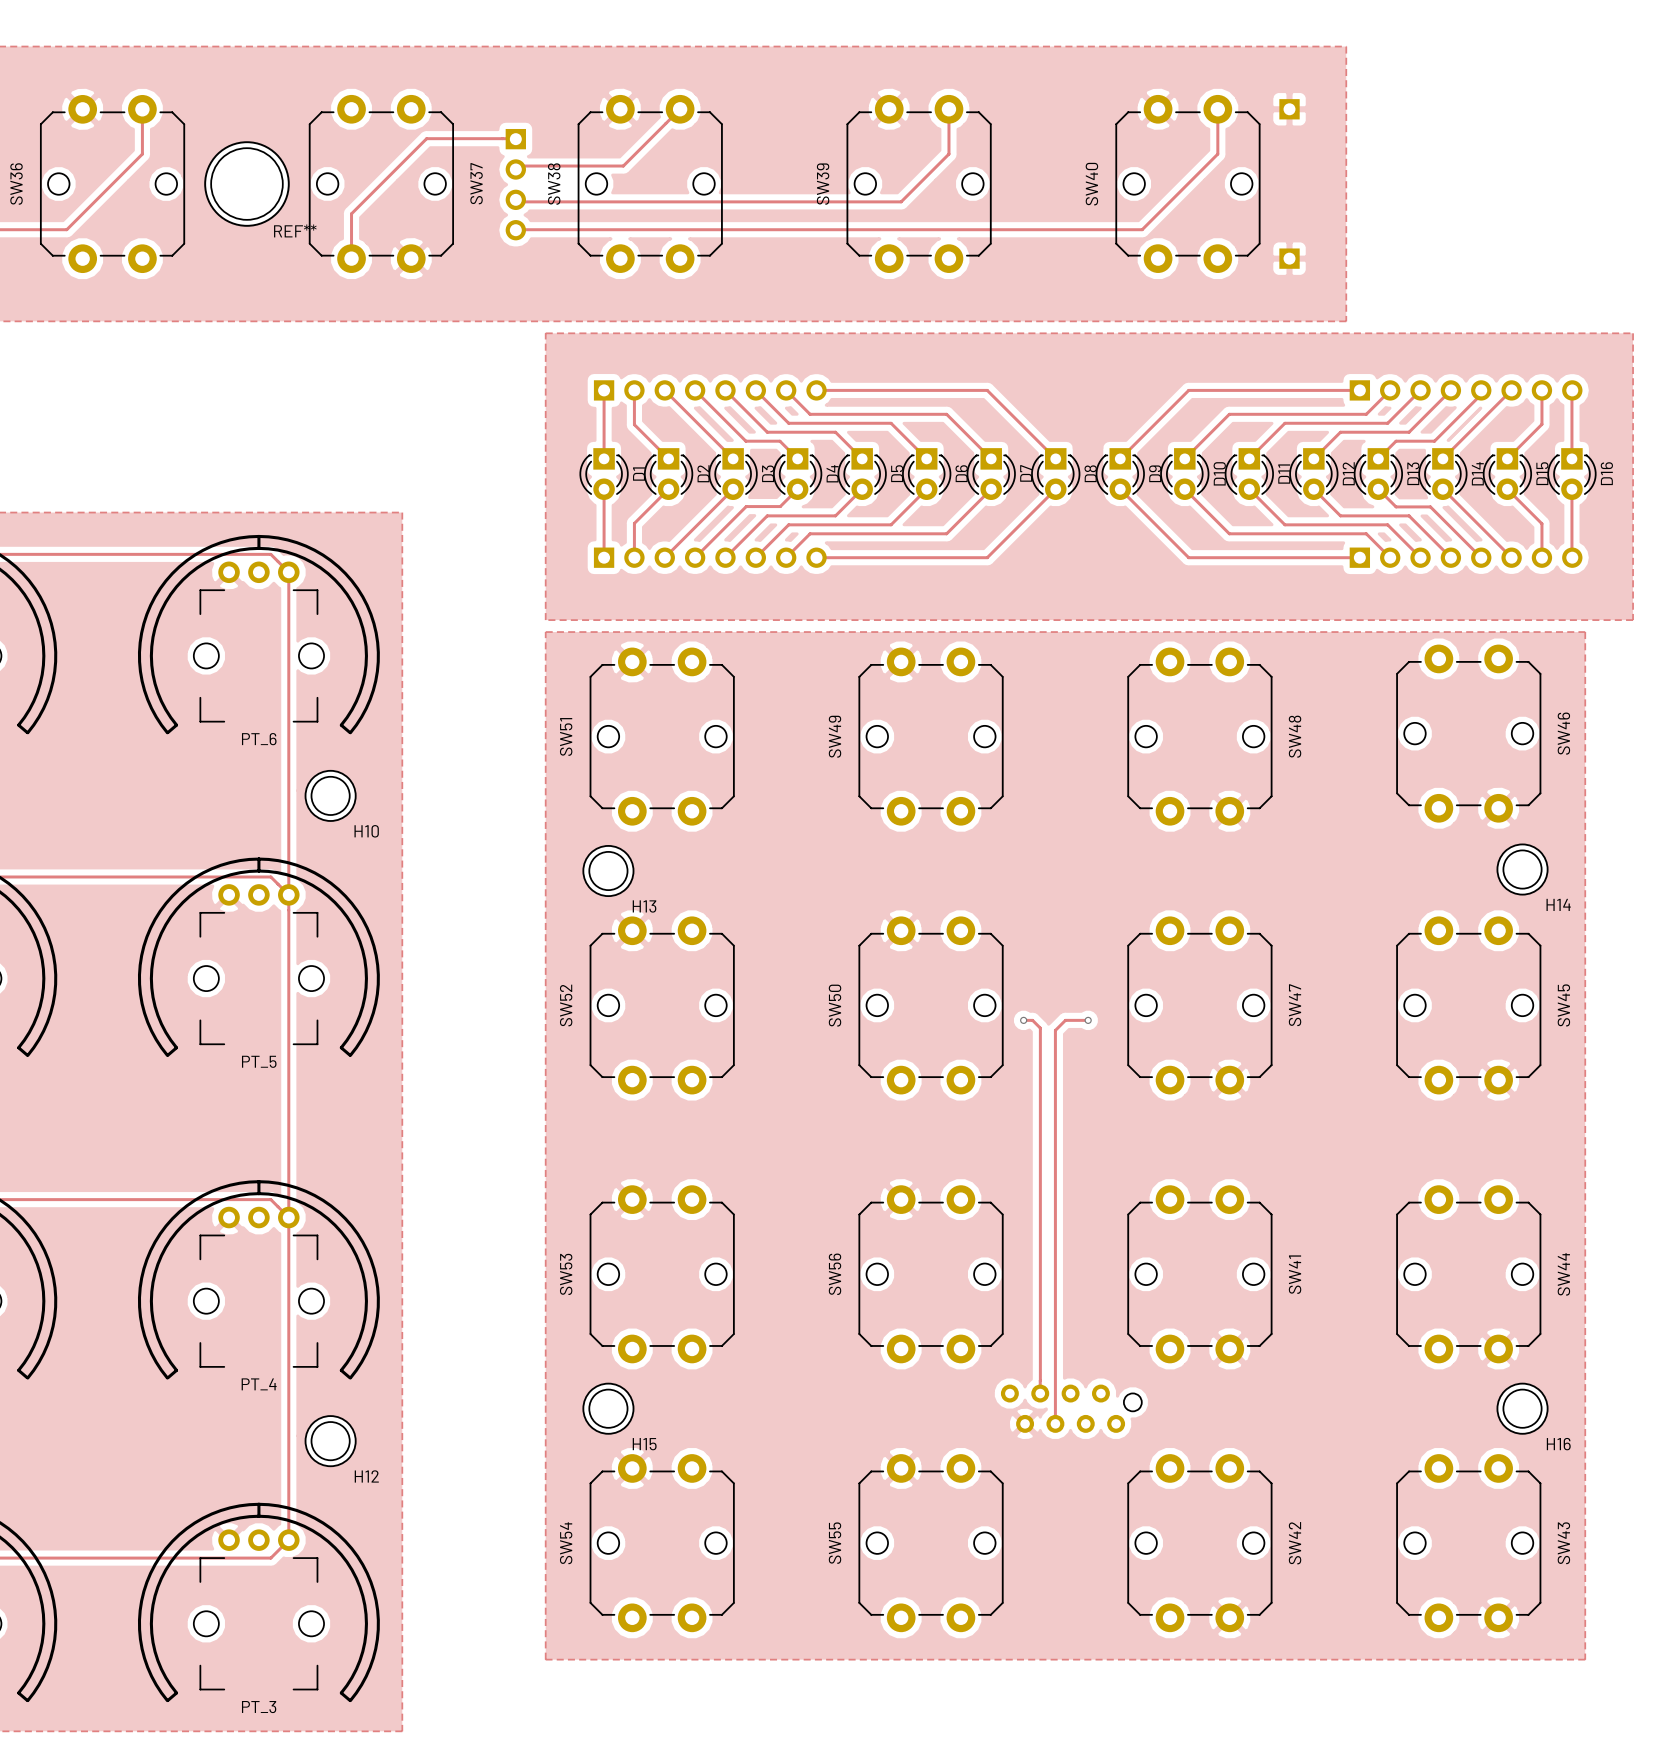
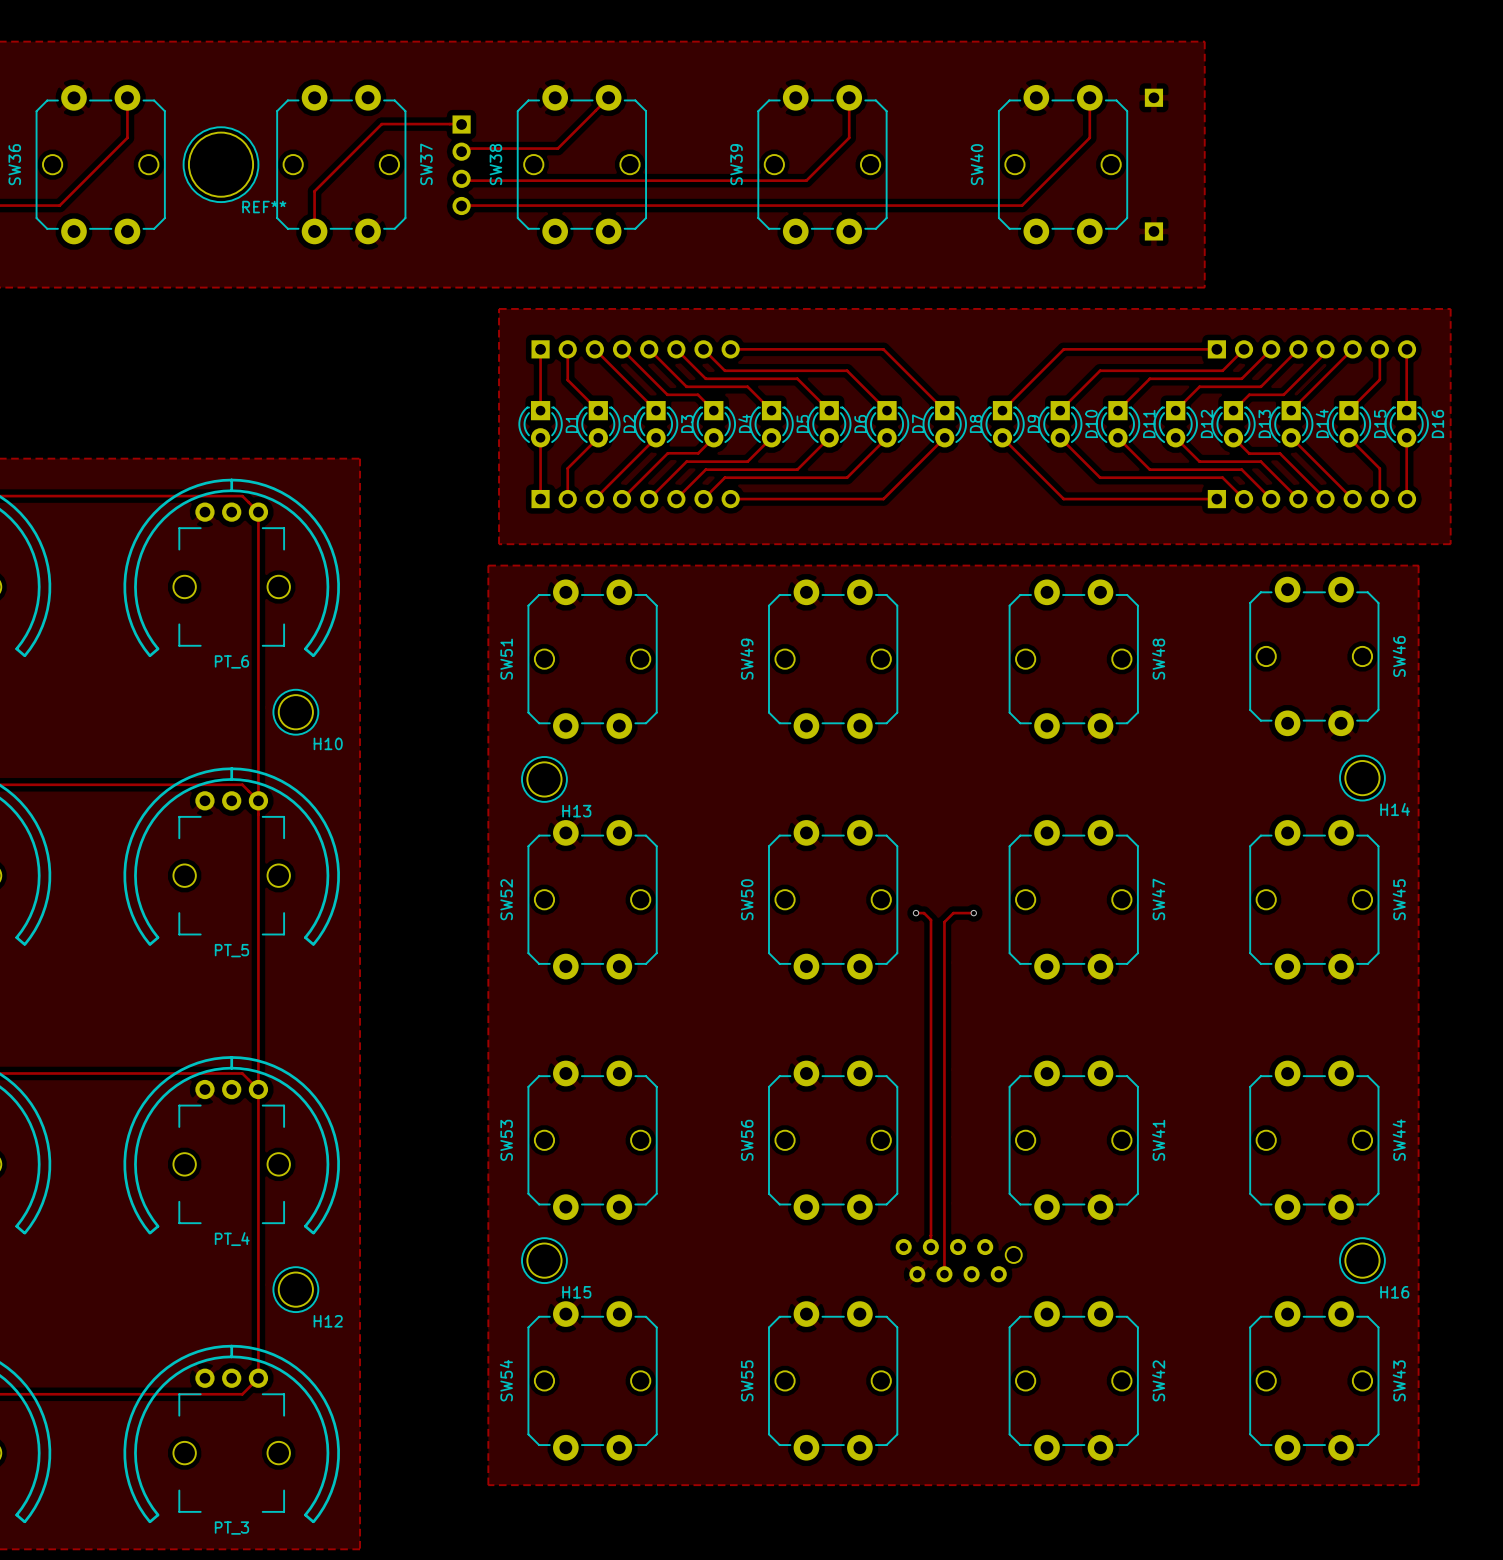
zone outline: (545, 333) (545, 620) (1633, 620) (1633, 333) (545, 333) -> (499, 308) (499, 544) (1450, 544) (1450, 308) (499, 308)

